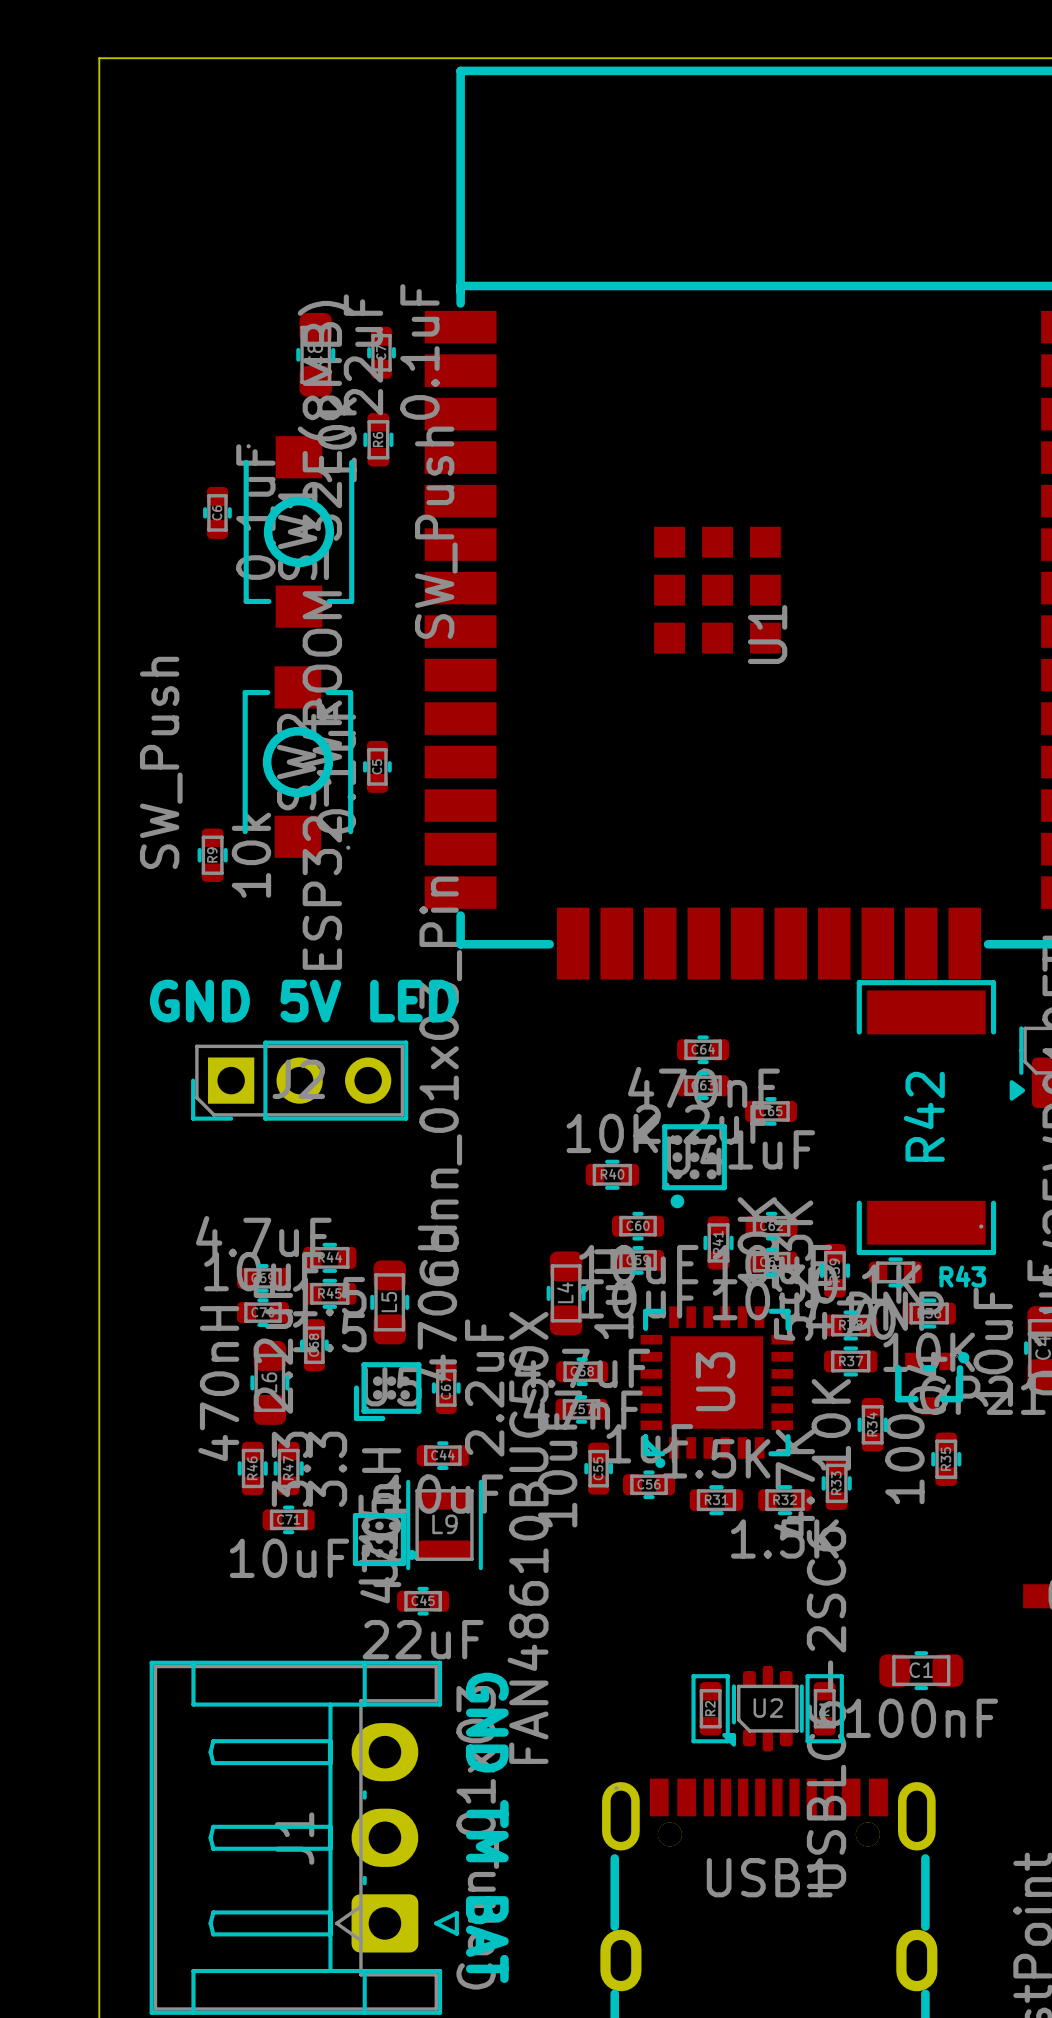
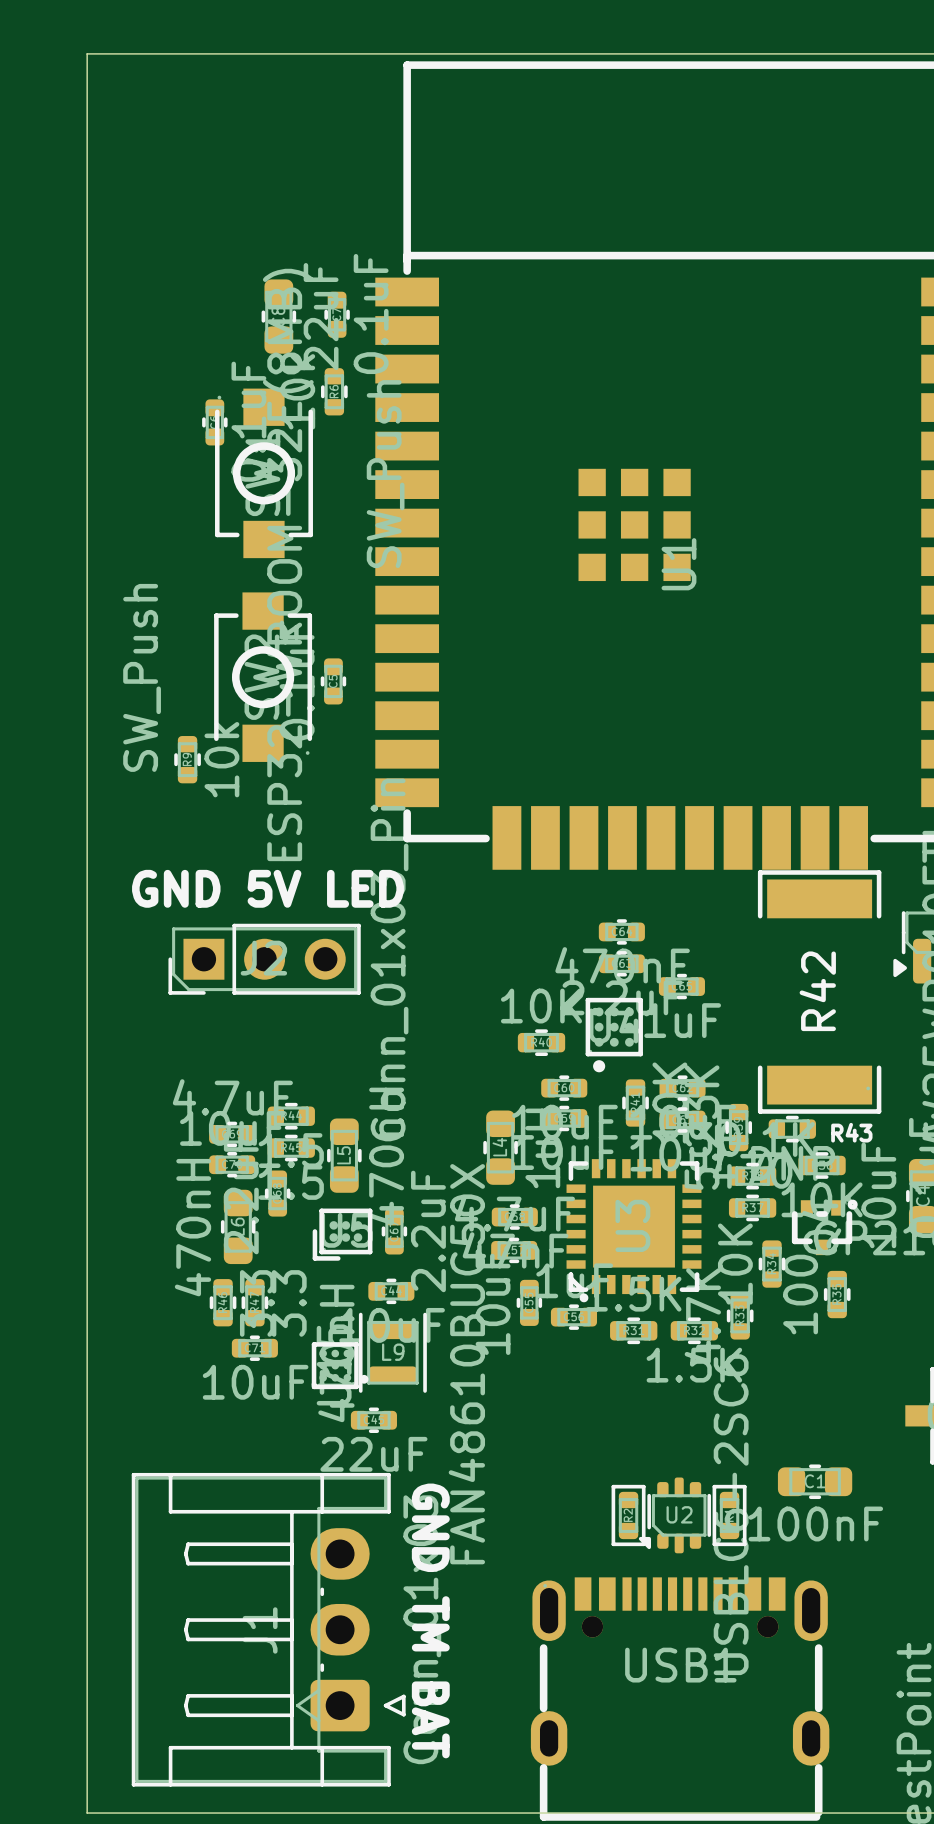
C6 position: (217, 512) -> (214, 422)

